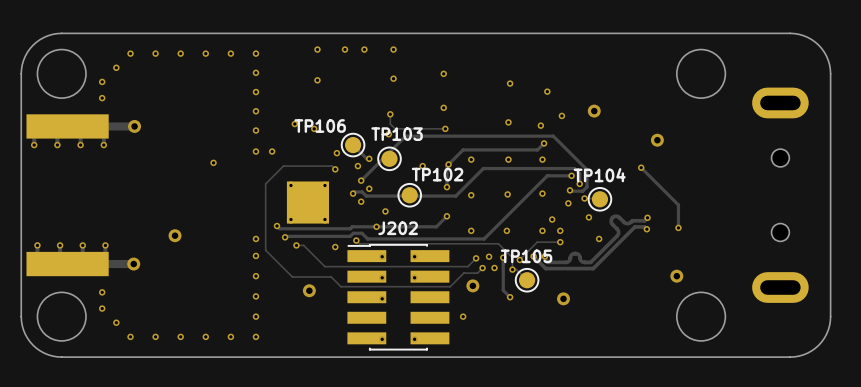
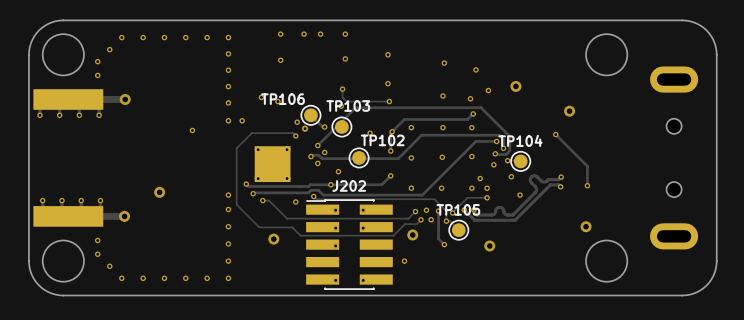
via: none -> (305, 128)
via: (357, 166) -> none

